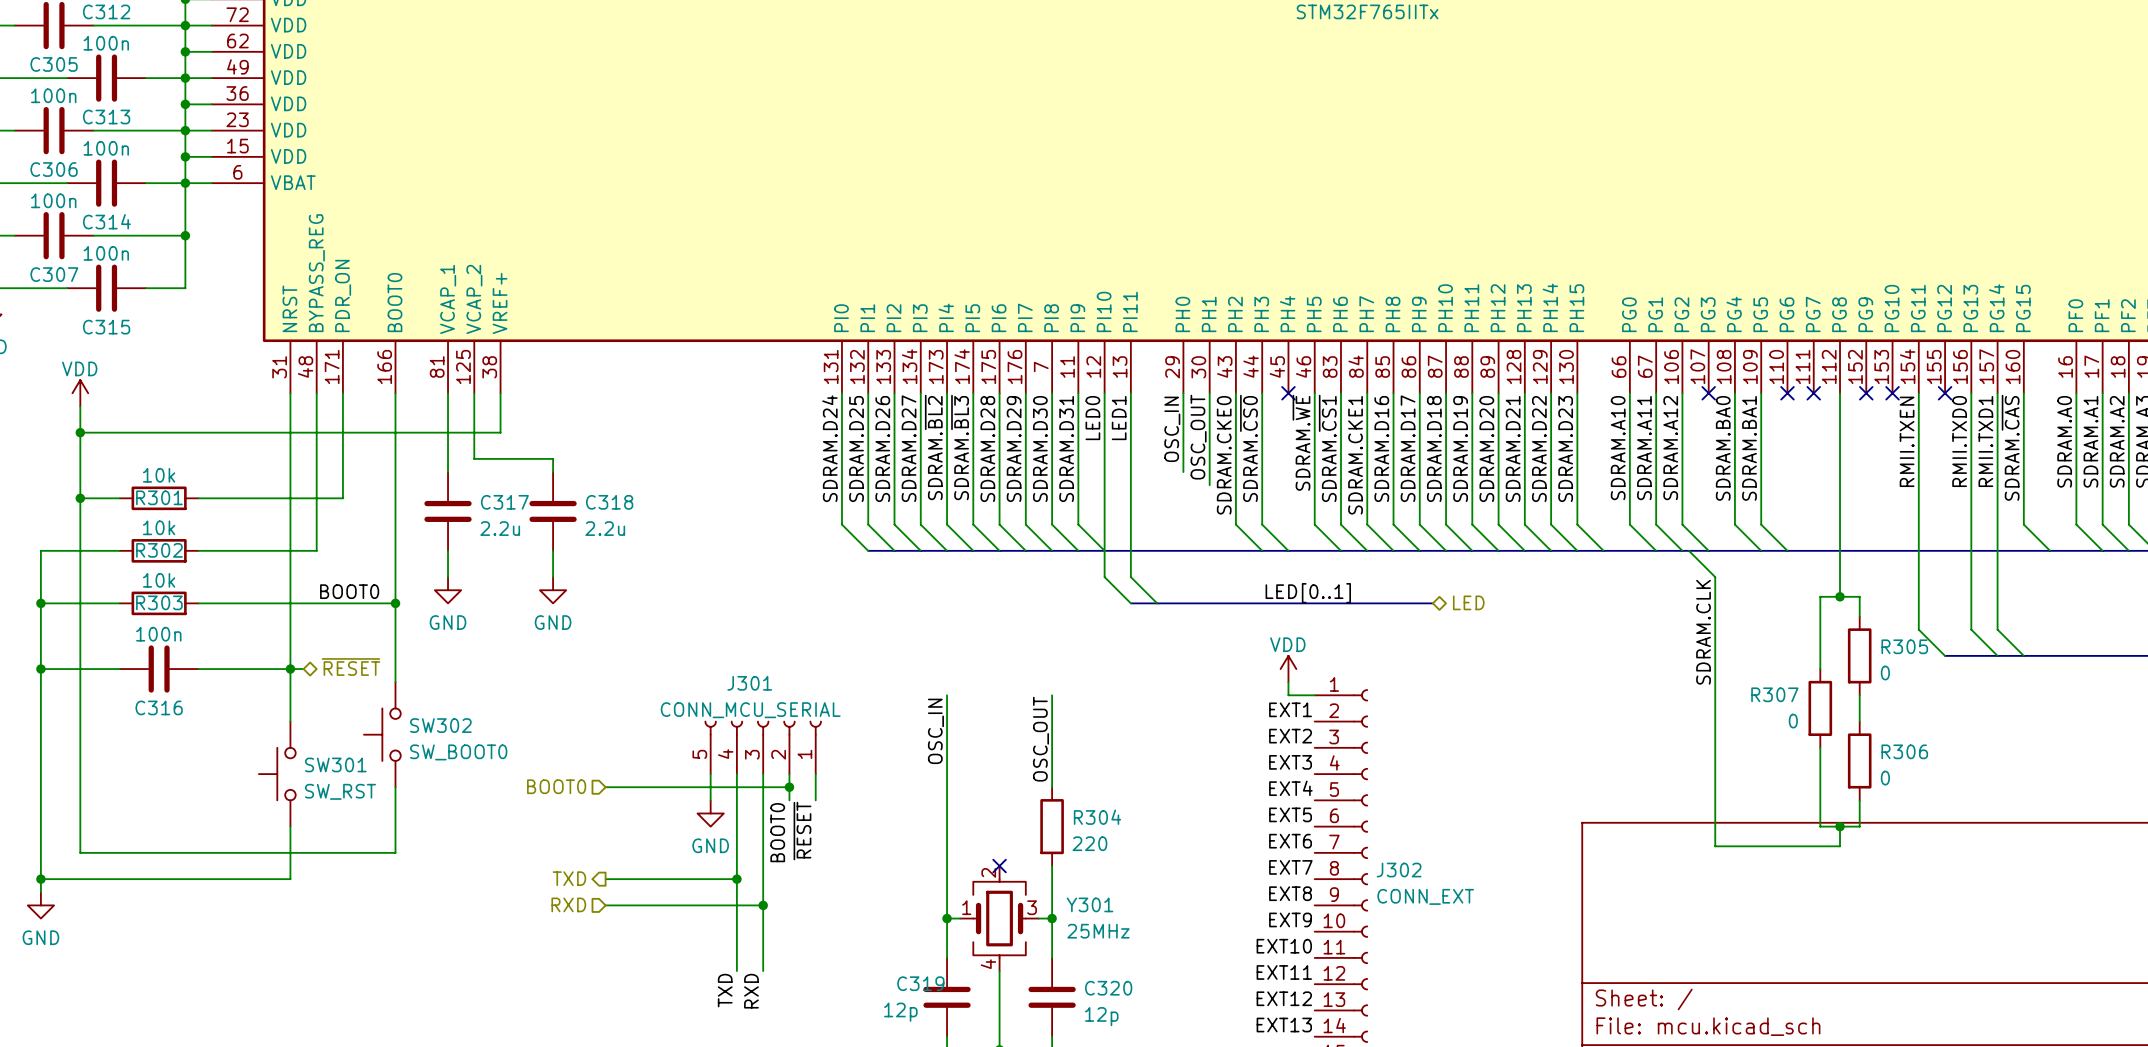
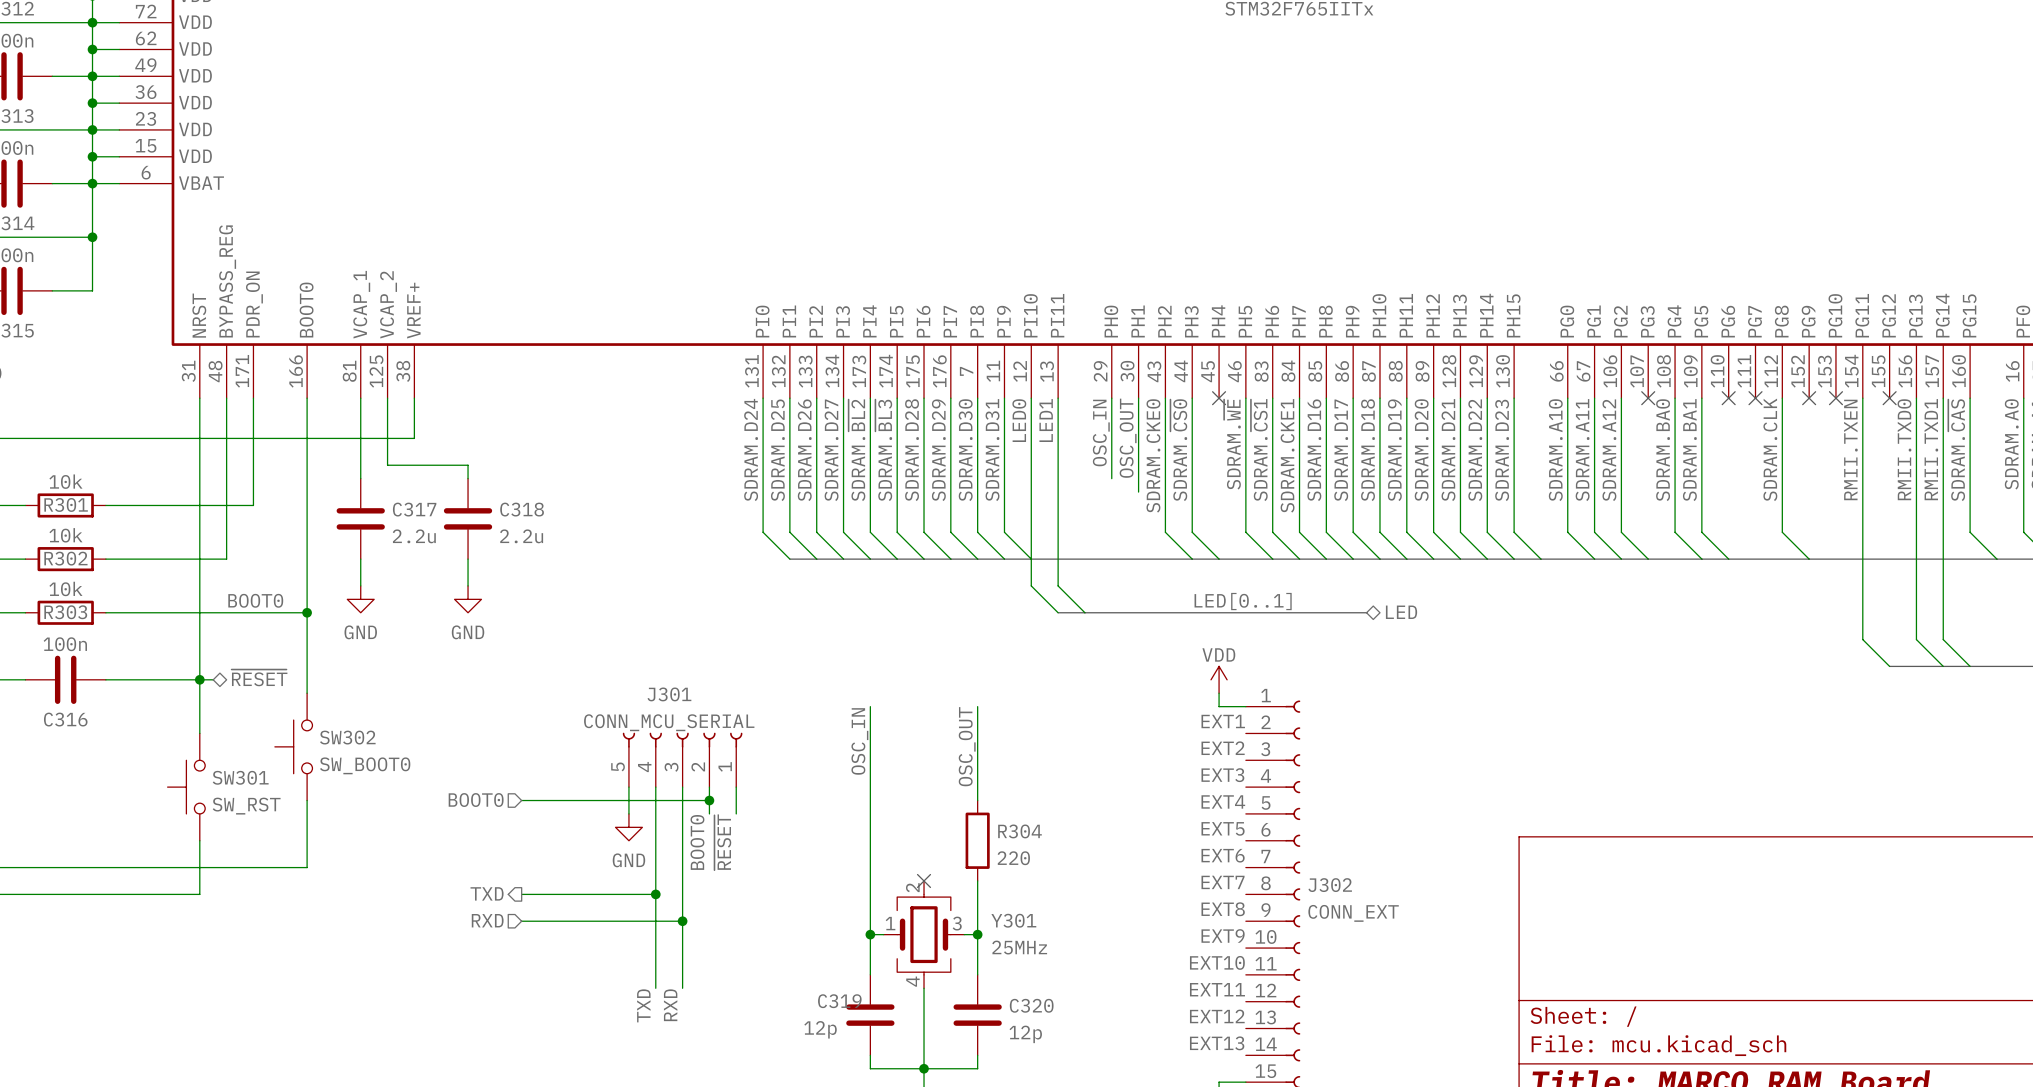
wire: (1840, 524) (1840, 596) -> (1782, 532) (1809, 559)
wire: (1688, 550) (1715, 577) -> none
wire: (1715, 577) (1715, 846) (1840, 846) (1840, 826) -> none
junction: (1840, 596) -> none
wire: (1859, 616) (1859, 596) (1820, 596) (1820, 669) -> none
label position: SDRAM.CLK (1703, 632) -> SDRAM.CLK (1770, 449)
R305: 0 (1859, 655) -> none
wire: (1859, 695) (1859, 721) -> none
R307: 0 (1820, 708) -> none
wire: (1820, 747) (1820, 826) (1859, 826) (1859, 800) -> none
R306: 0 (1859, 760) -> none
junction: (1840, 826) -> none

